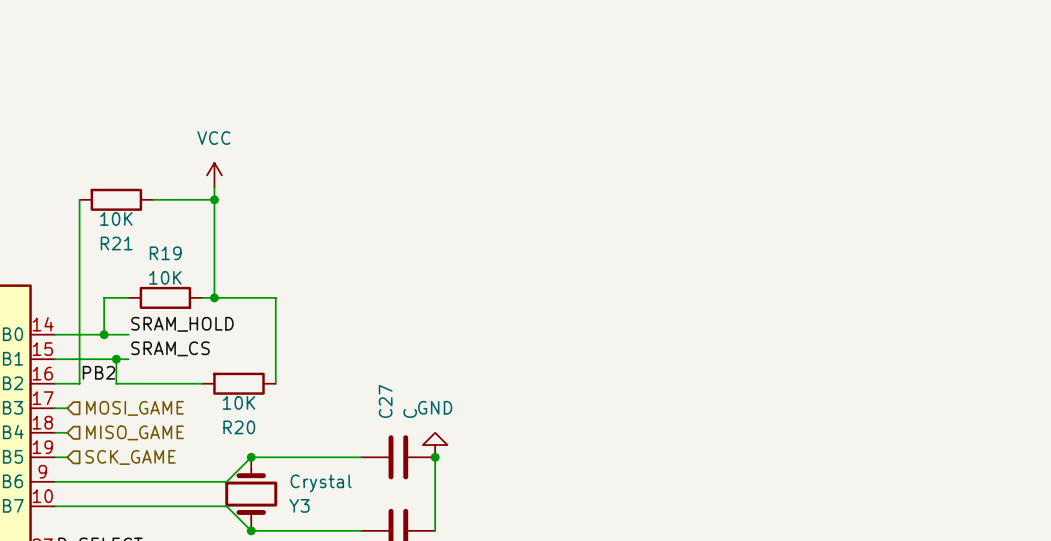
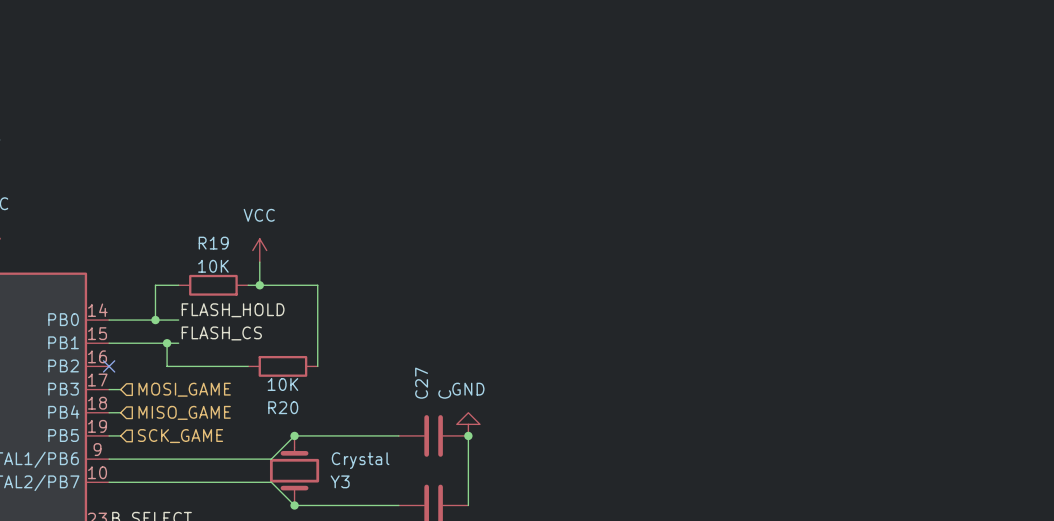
power symbol position: VCC (214, 175) -> VCC (259, 250)
wire: (214, 187) (214, 273) -> none
wire: (79, 199) (79, 383) (55, 383) -> none
R21: 10K (116, 199) -> none
wire: (153, 199) (214, 199) -> none
junction: (214, 199) -> none
label: SRAM_HOLD (182, 324) -> FLASH_HOLD (233, 310)
label: SRAM_CS (170, 348) -> FLASH_CS (221, 333)
label: PB2 (98, 372) -> none
no-connect mark: none -> (109, 366)

